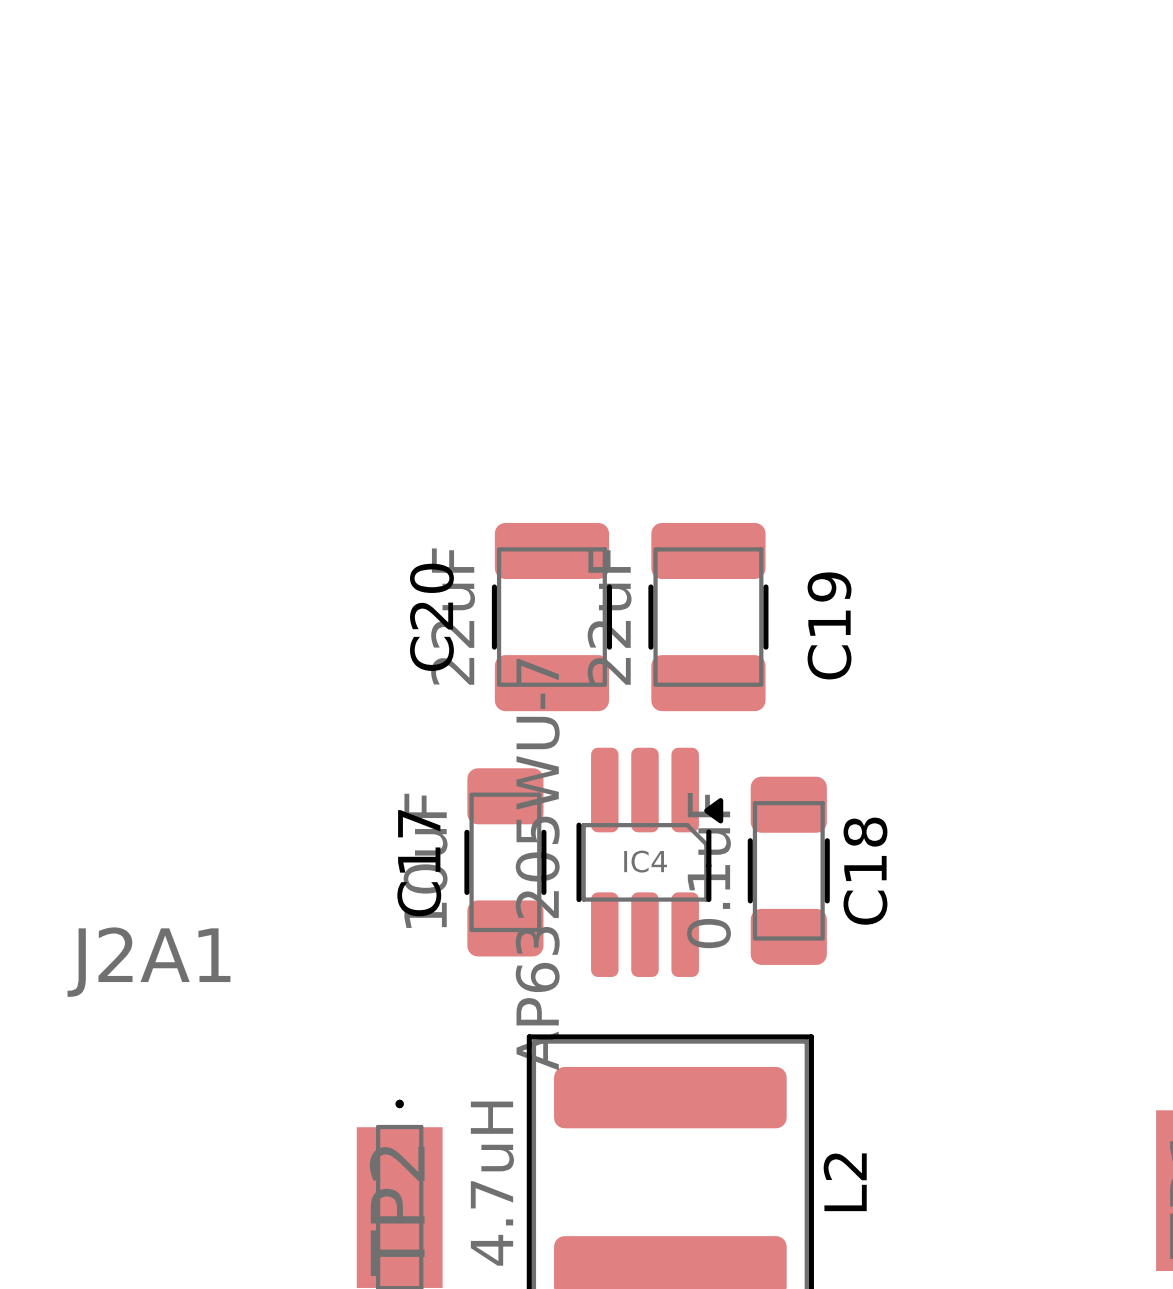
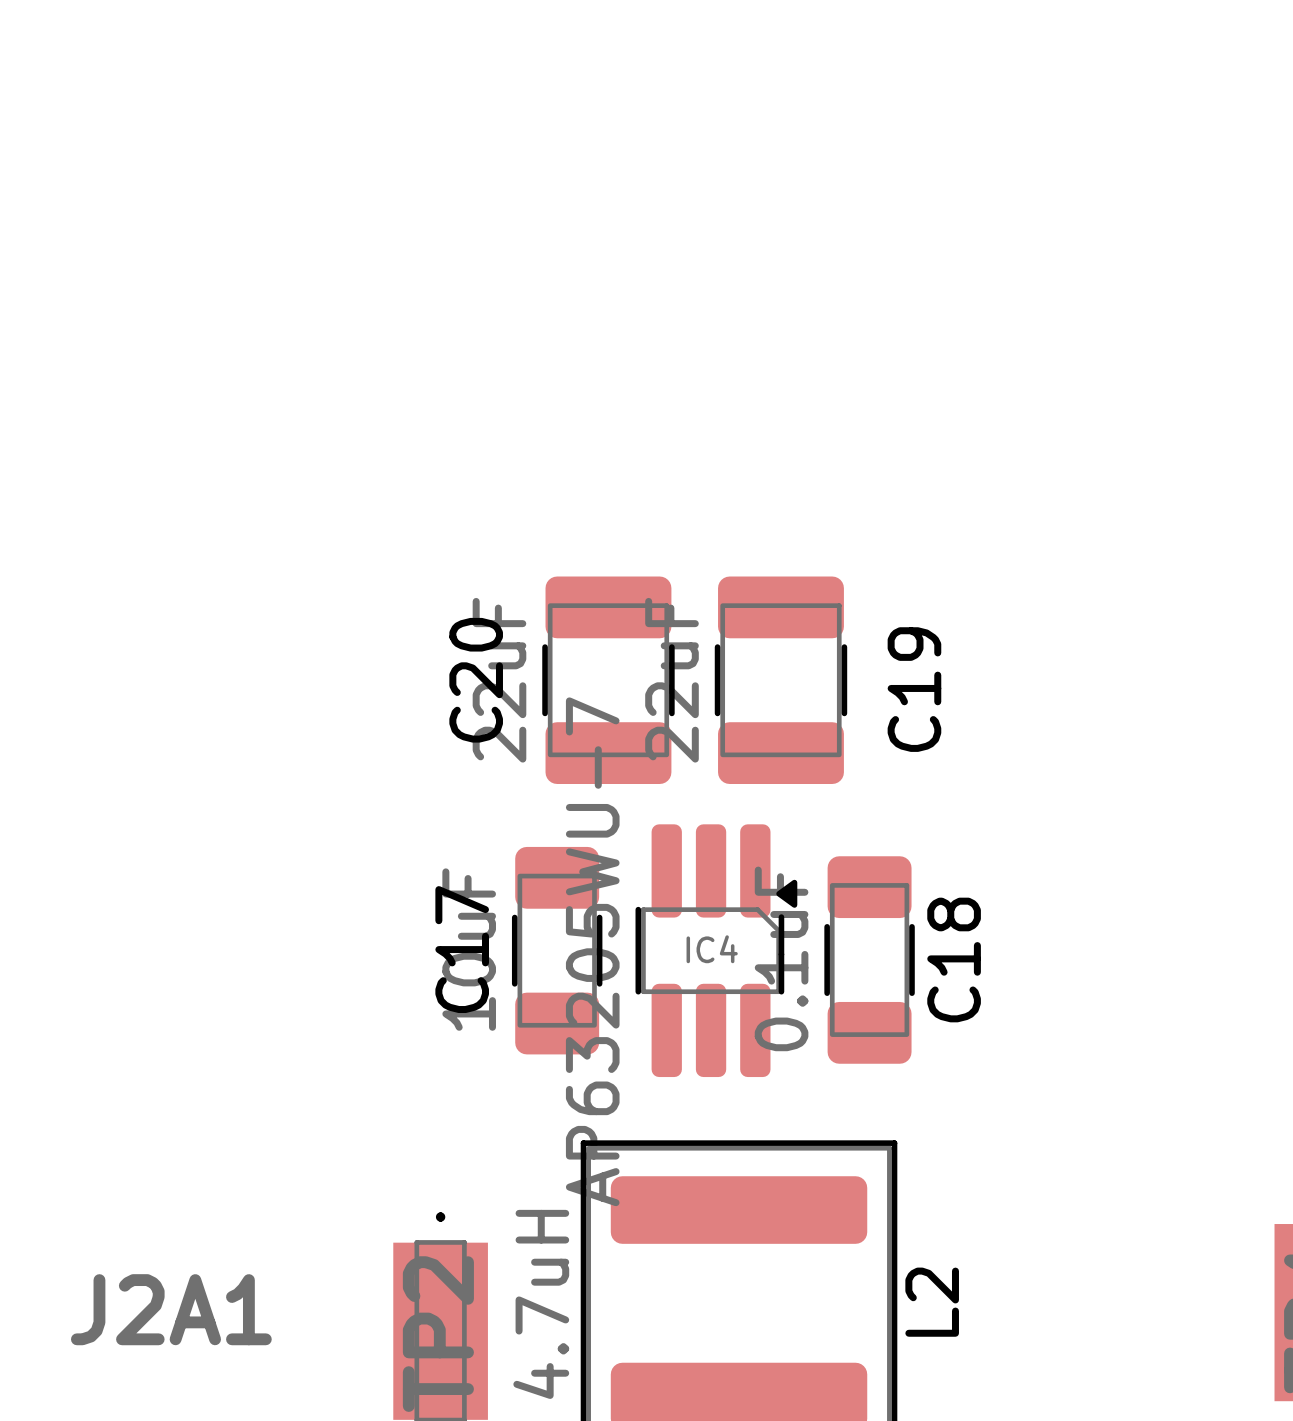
J2A1 name position: J2A1 (148, 962) -> J2A1 (171, 1309)

